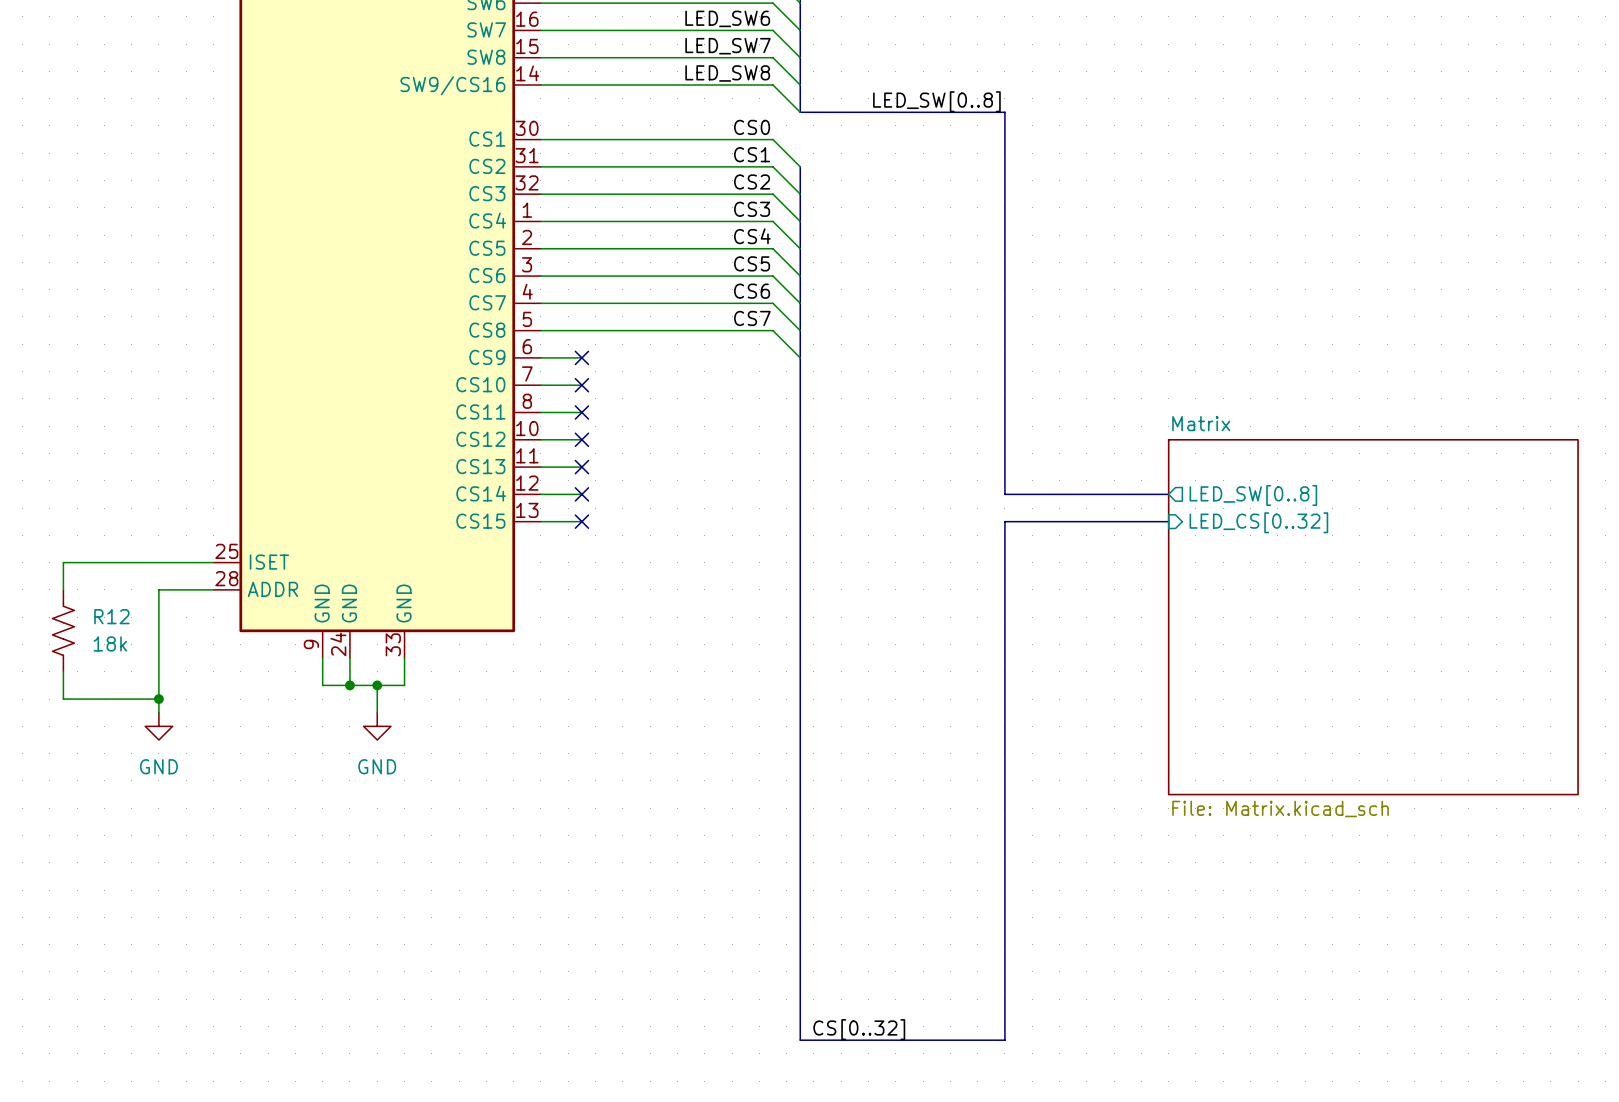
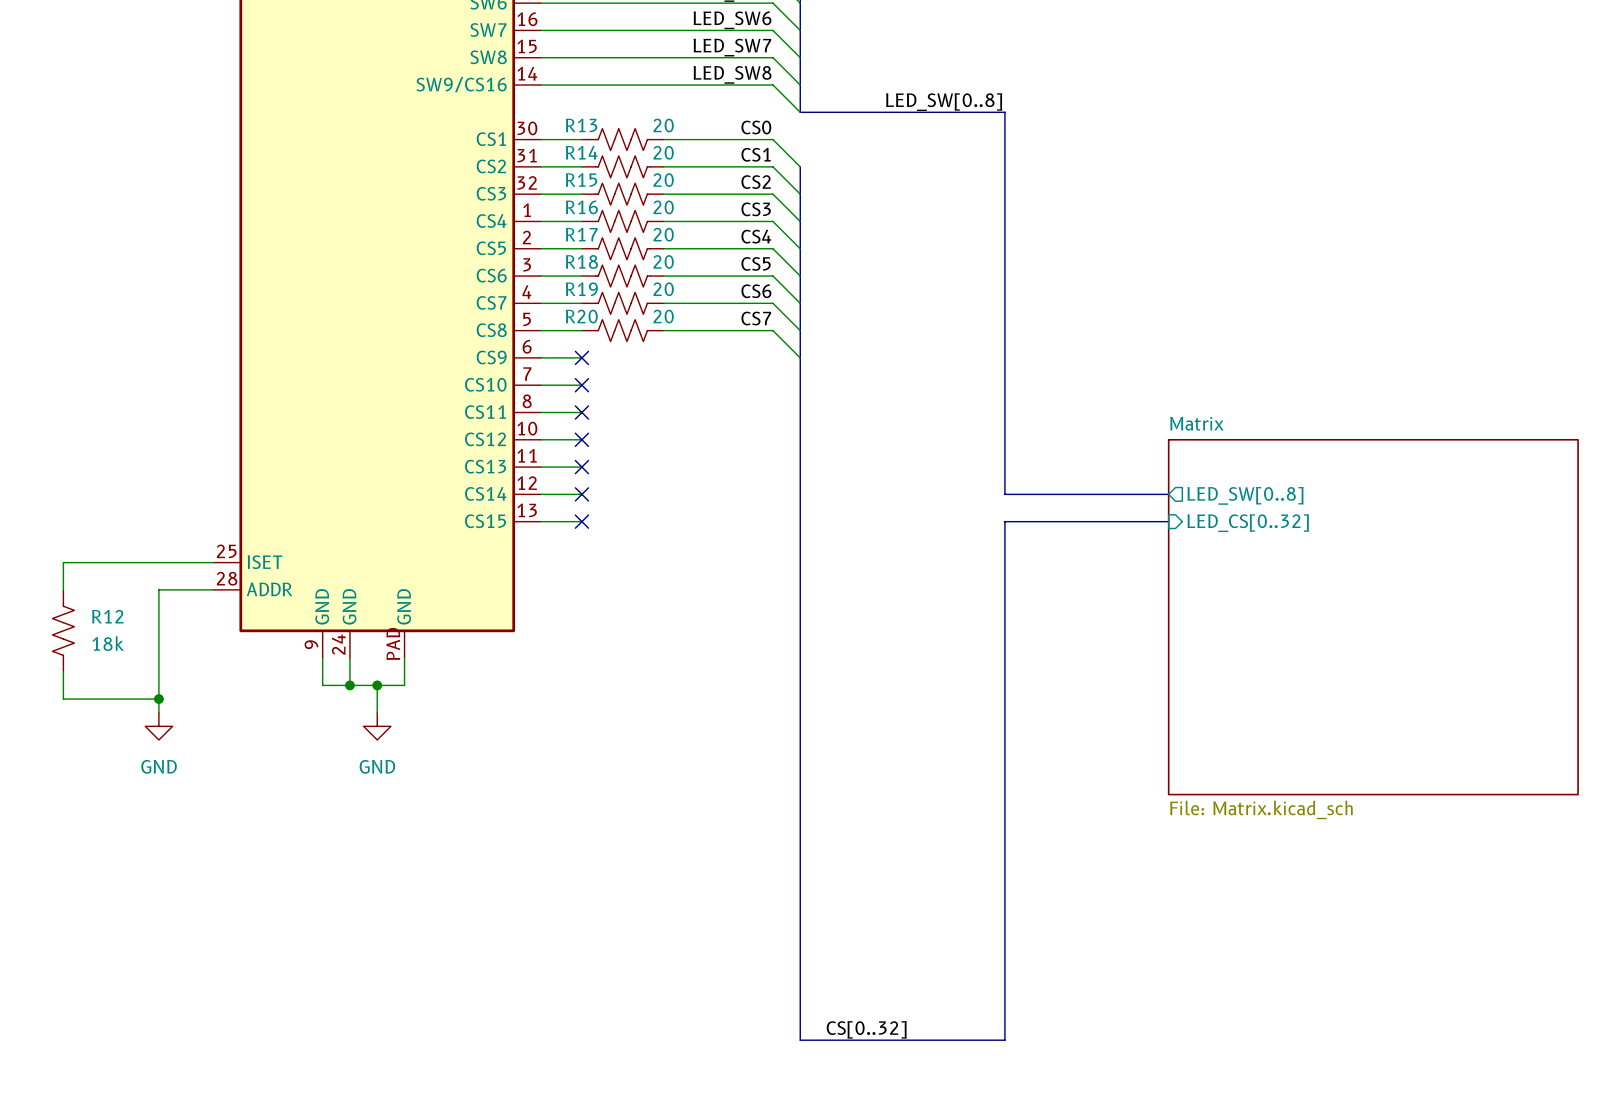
R13: none -> 20 (622, 139)
R14: none -> 20 (622, 166)
R15: none -> 20 (622, 194)
R16: none -> 20 (622, 221)
R17: none -> 20 (622, 248)
R18: none -> 20 (622, 276)
R19: none -> 20 (622, 303)
R20: none -> 20 (622, 330)
part pin number: 33 (393, 644) -> PAD (393, 644)

